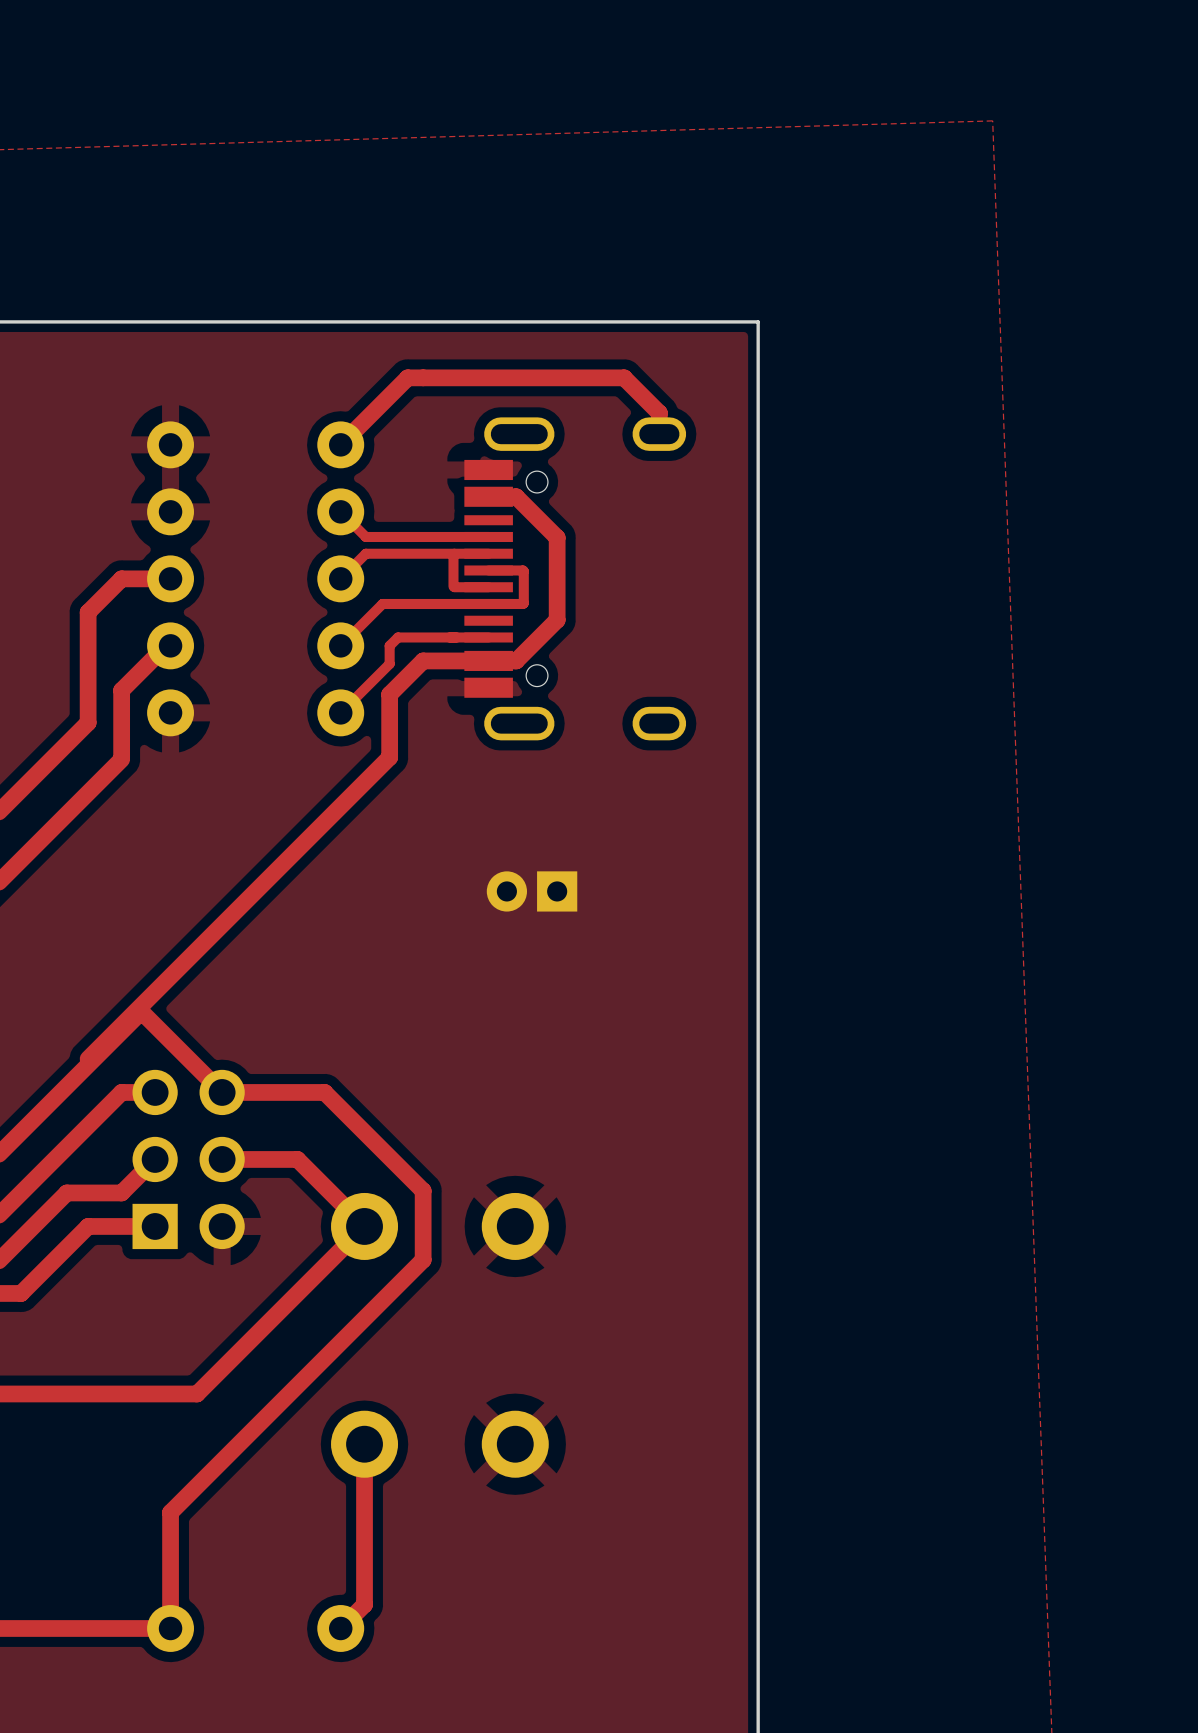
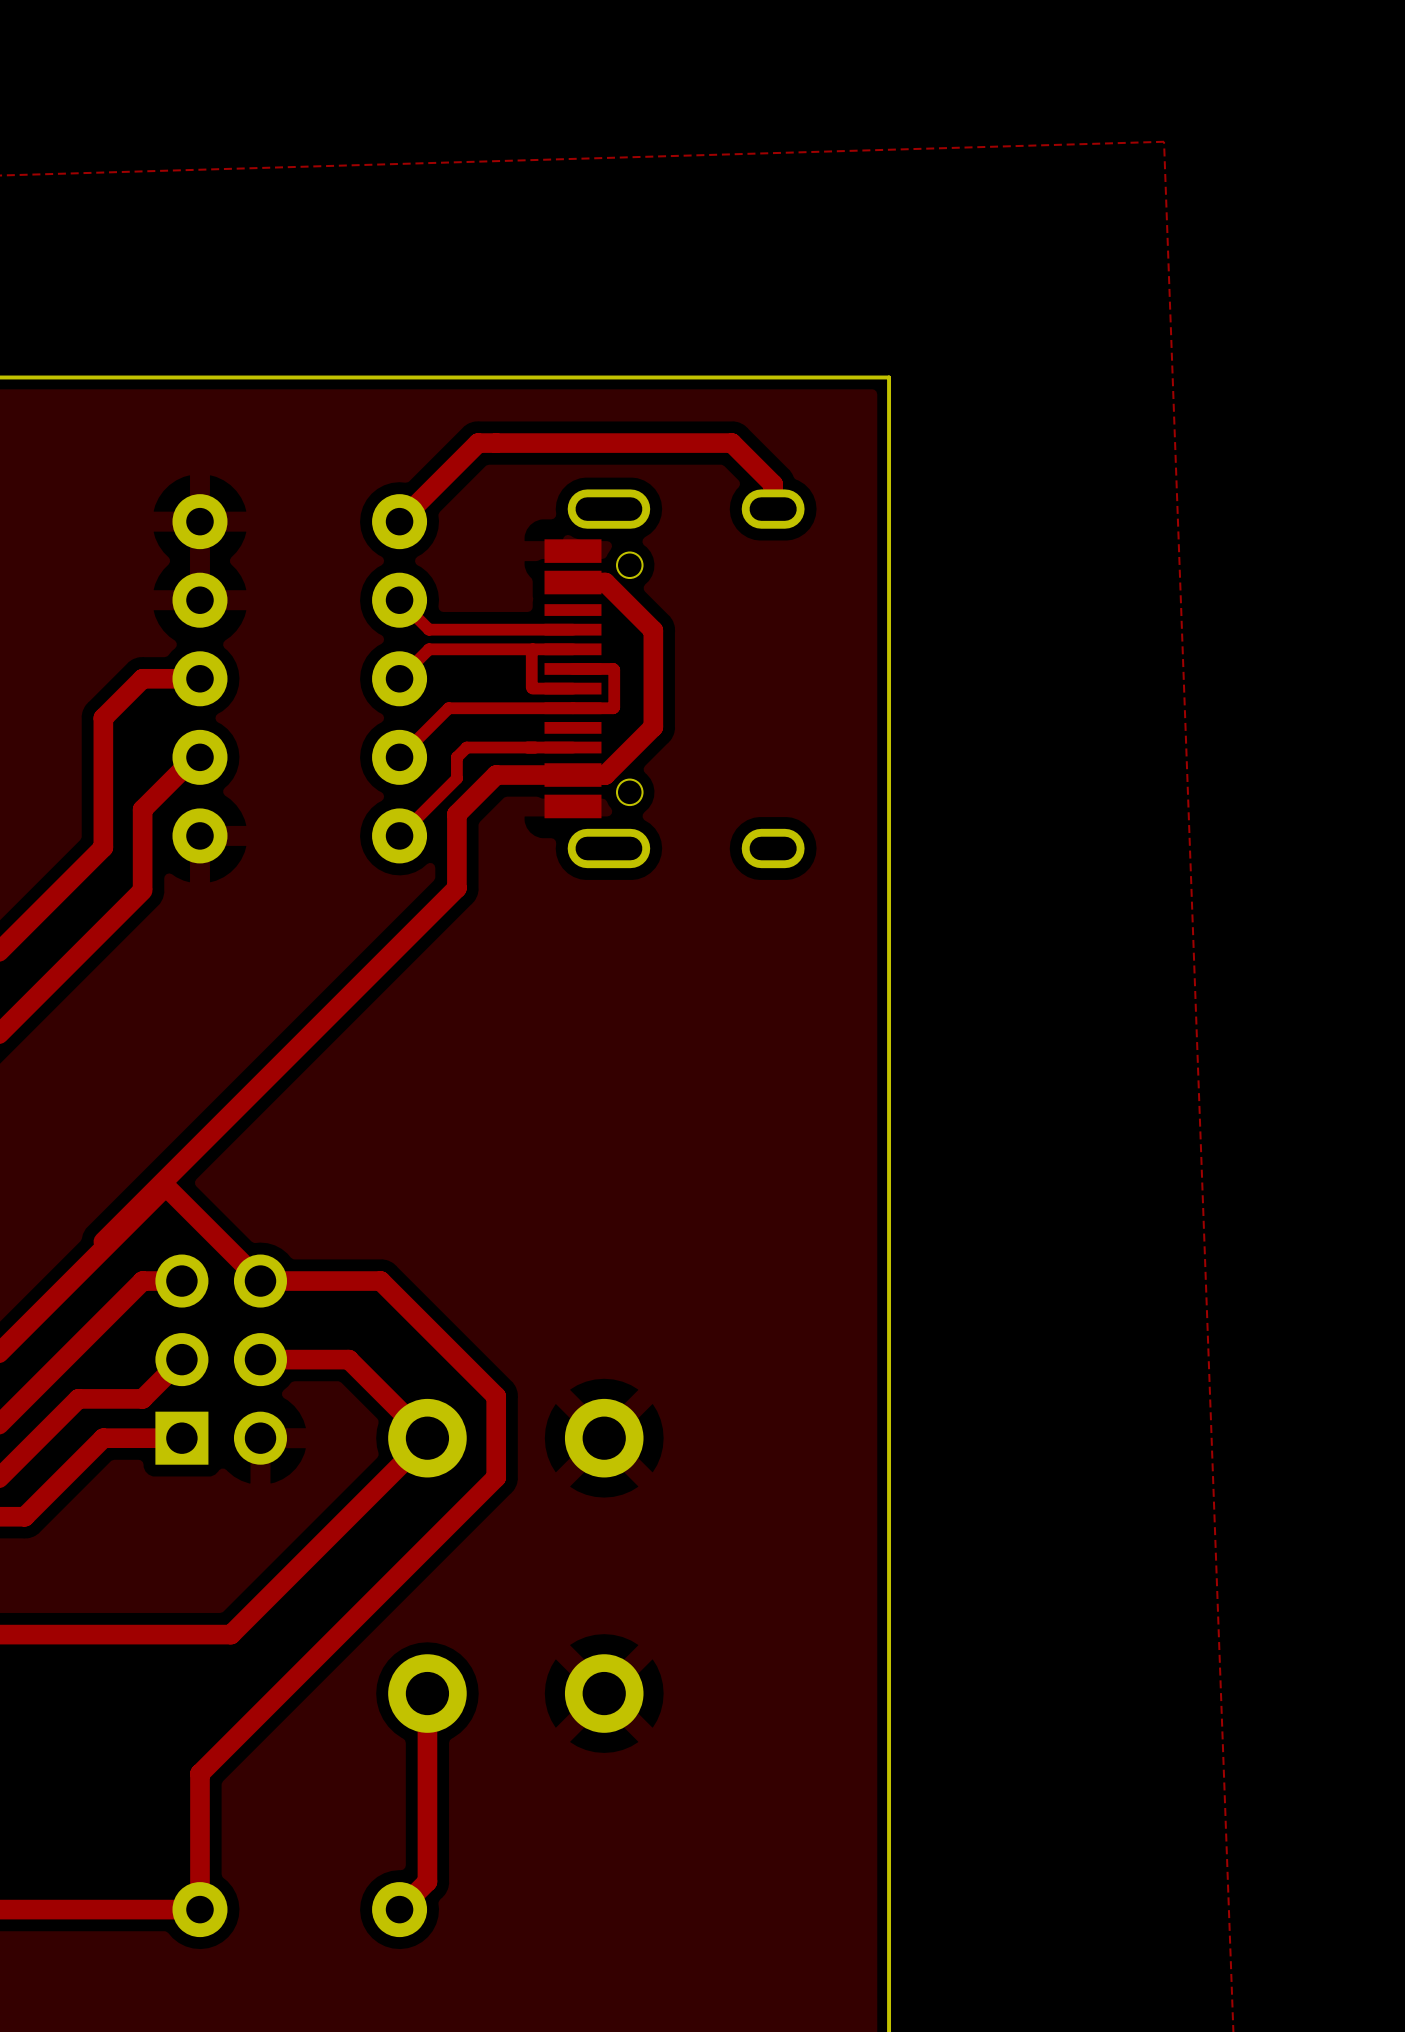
part: (532, 891) -> none

